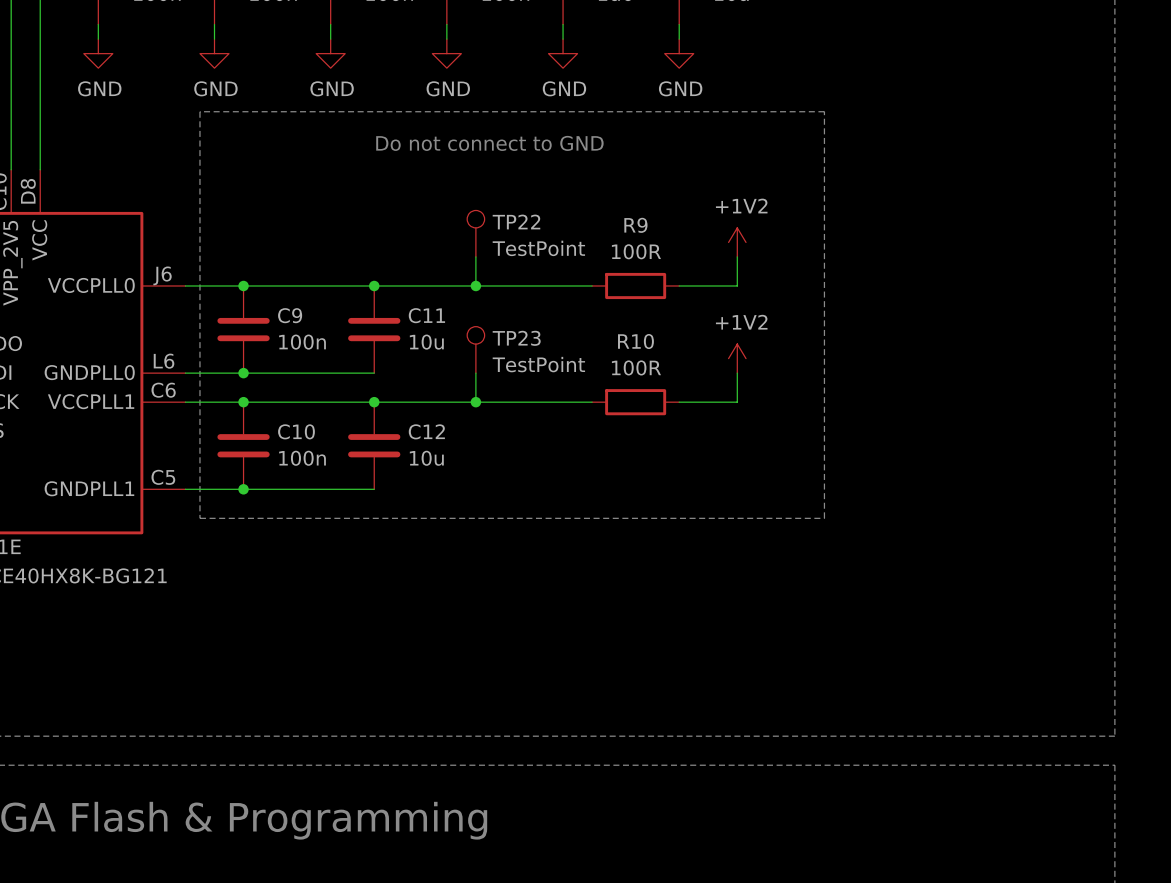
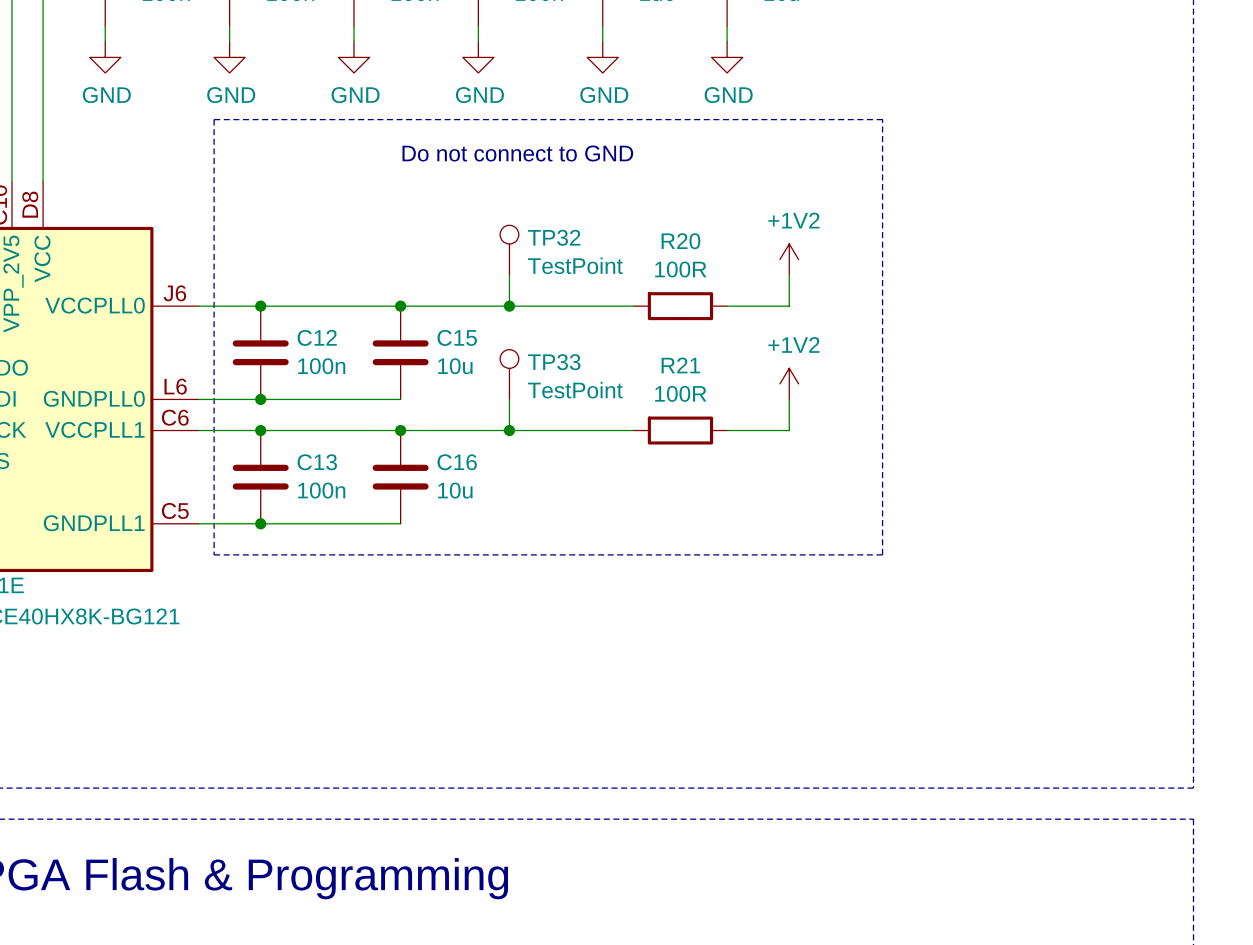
TP22 name: TP22 (516, 222) -> TP32 (554, 237)
R9 name: R9 (635, 225) -> R20 (680, 241)
C9 name: C9 (290, 315) -> C12 (317, 337)
C11 name: C11 (426, 315) -> C15 (457, 337)
TP23 name: TP23 (516, 338) -> TP33 (554, 362)
R10 name: R10 (635, 341) -> R21 (680, 365)
C10 name: C10 (296, 431) -> C13 (317, 462)
C12 name: C12 (426, 431) -> C16 (457, 462)

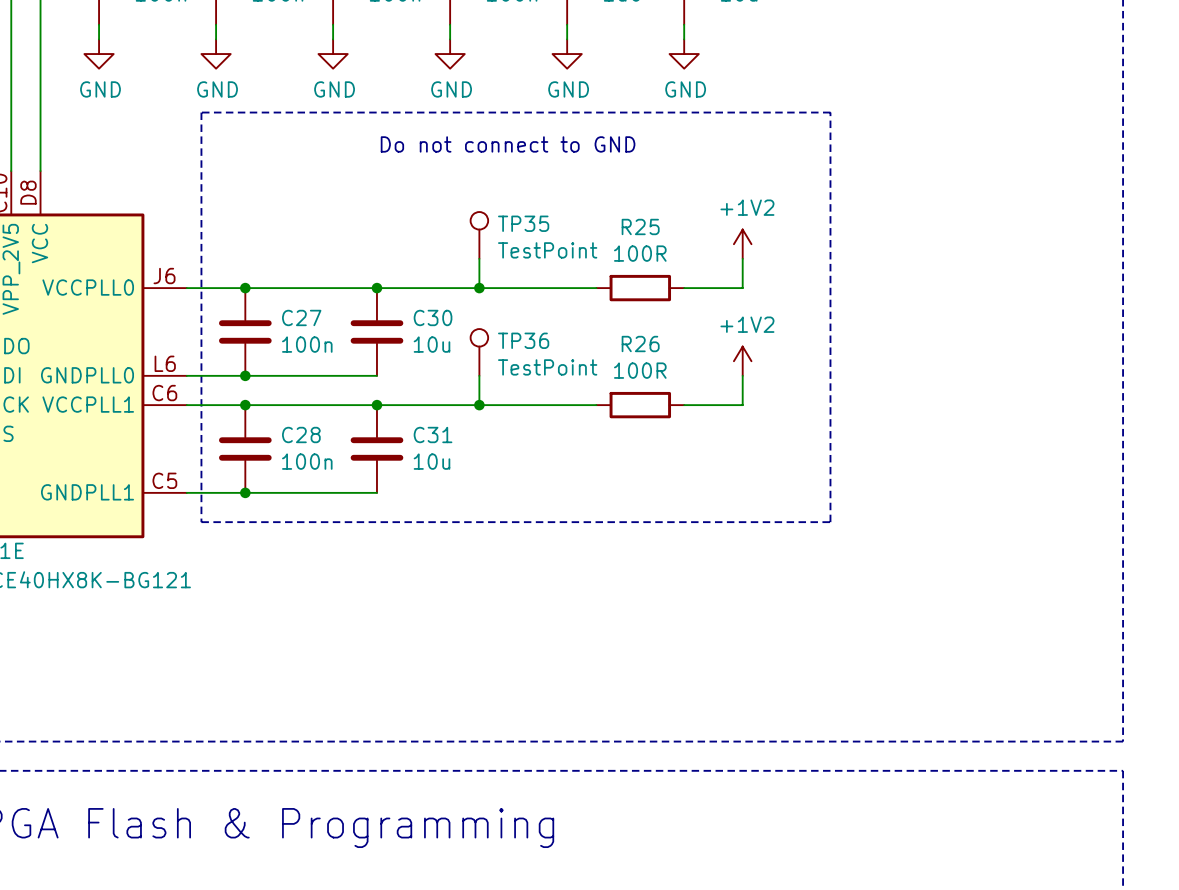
TP32 name: TP32 (554, 237) -> TP35 (523, 223)
R20 name: R20 (680, 241) -> R25 (640, 226)
C12 name: C12 (317, 337) -> C27 (301, 317)
C15 name: C15 (457, 337) -> C30 (433, 317)
TP33 name: TP33 (554, 362) -> TP36 (523, 340)
R21 name: R21 (680, 365) -> R26 (640, 344)
C13 name: C13 (317, 462) -> C28 (301, 434)
C16 name: C16 (457, 462) -> C31 (433, 434)

